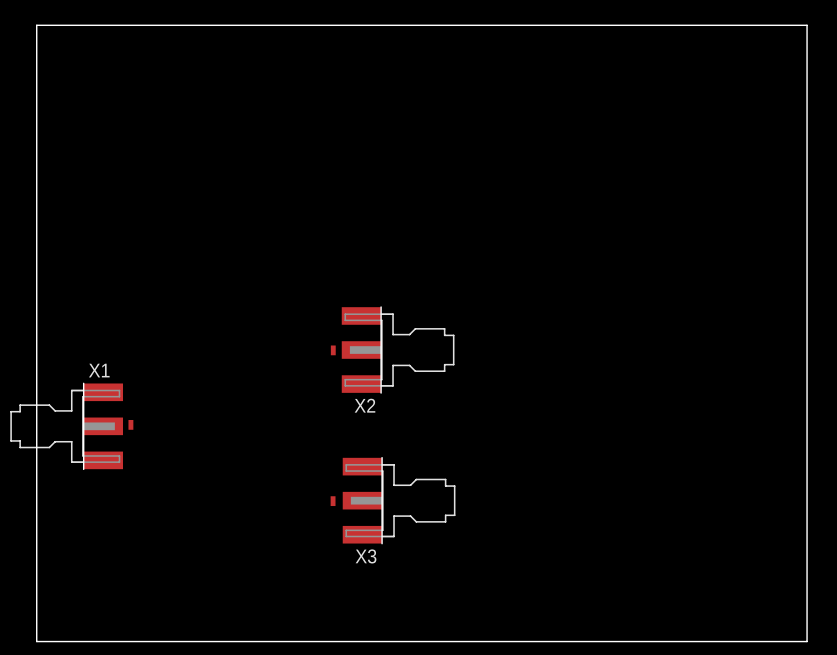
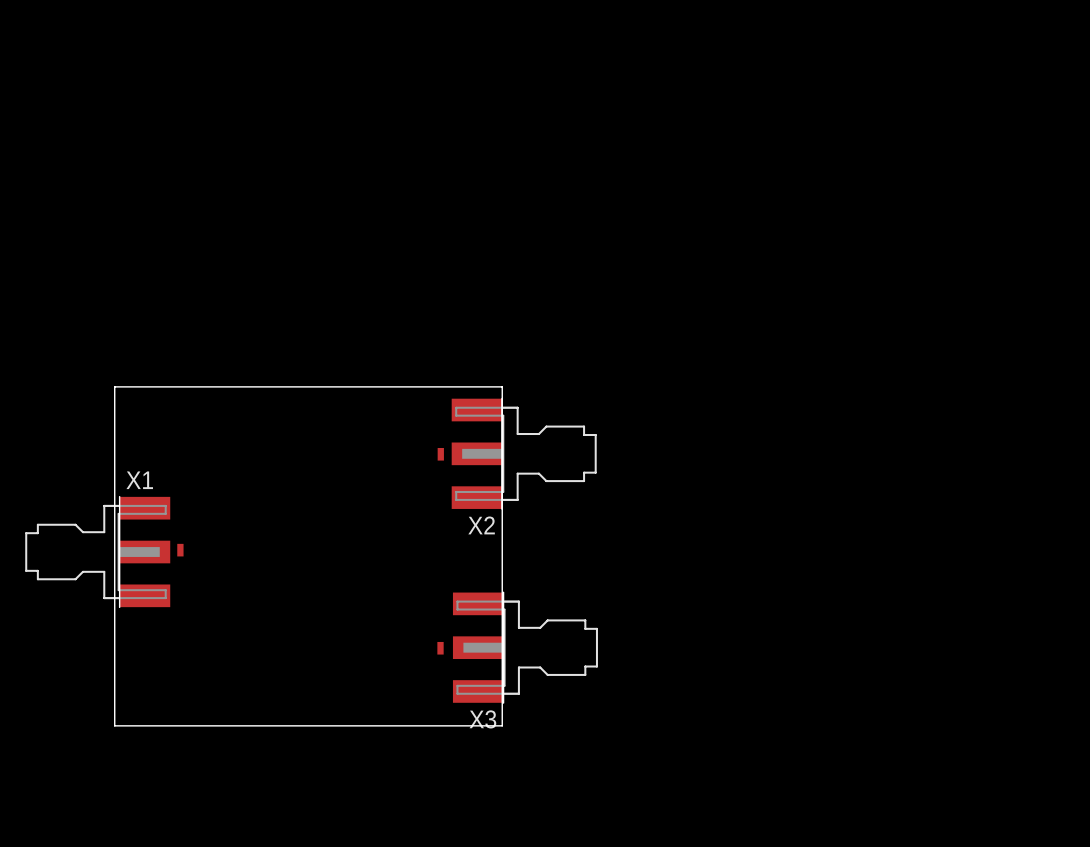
board edge: (36, 25) (807, 25) (807, 641) (36, 641) (36, 25) -> none
board edge: none -> (114, 386) (502, 386) (502, 725) (114, 725) (114, 386)

